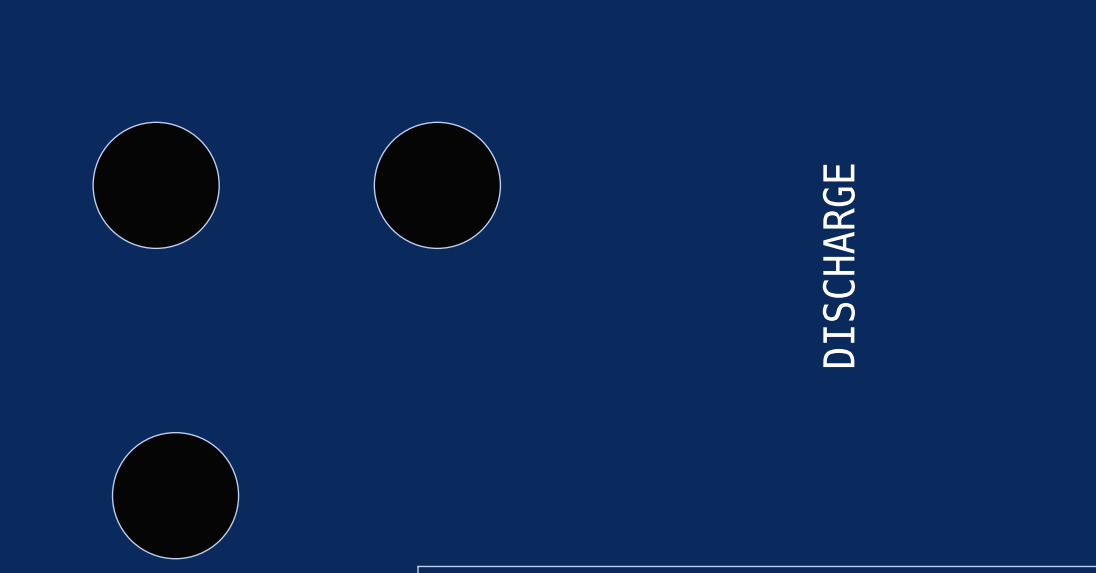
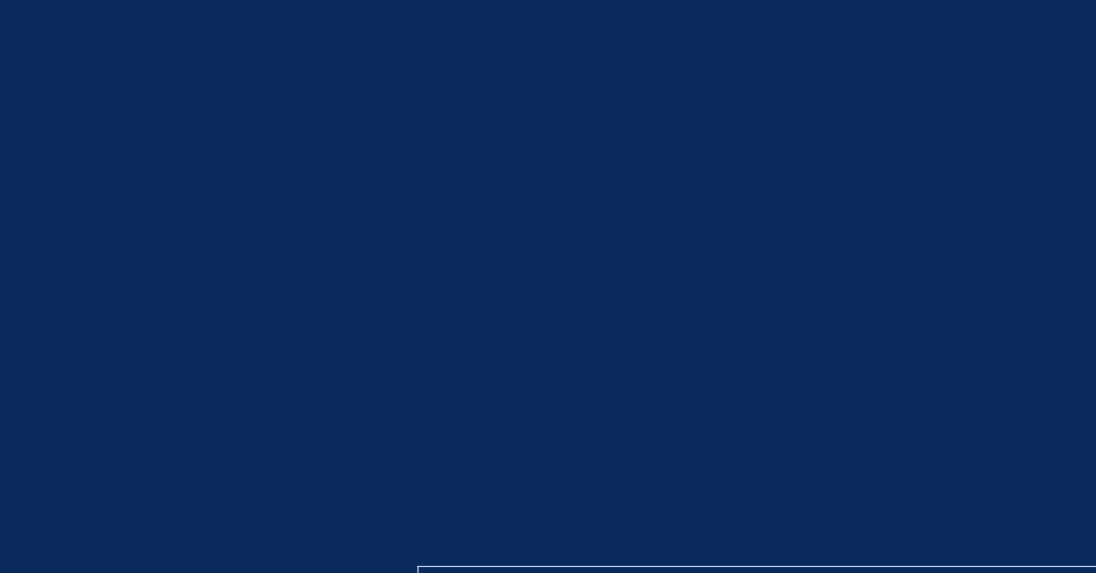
part: (156, 185) -> none
part: (437, 185) -> none
text: DISCHARGE (838, 265) -> none
part: (175, 495) -> none

